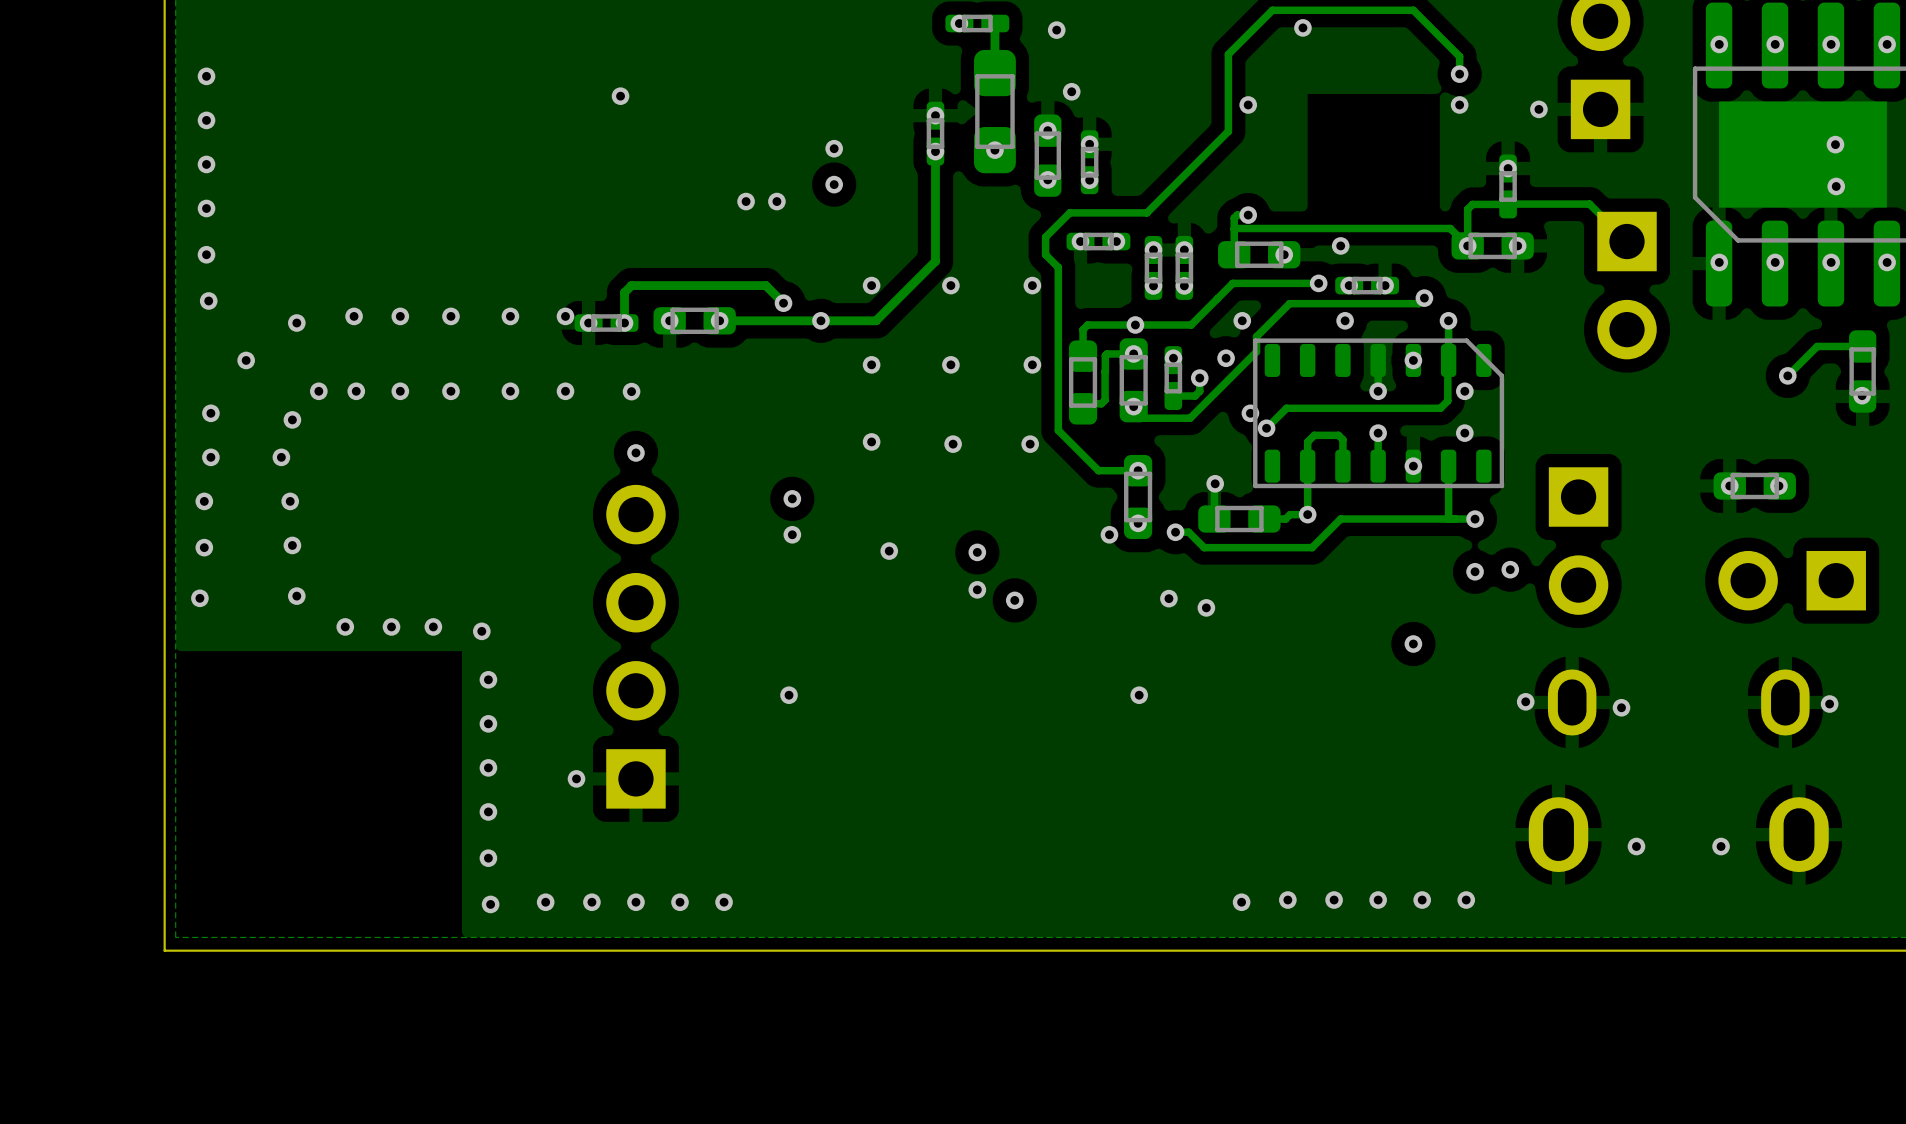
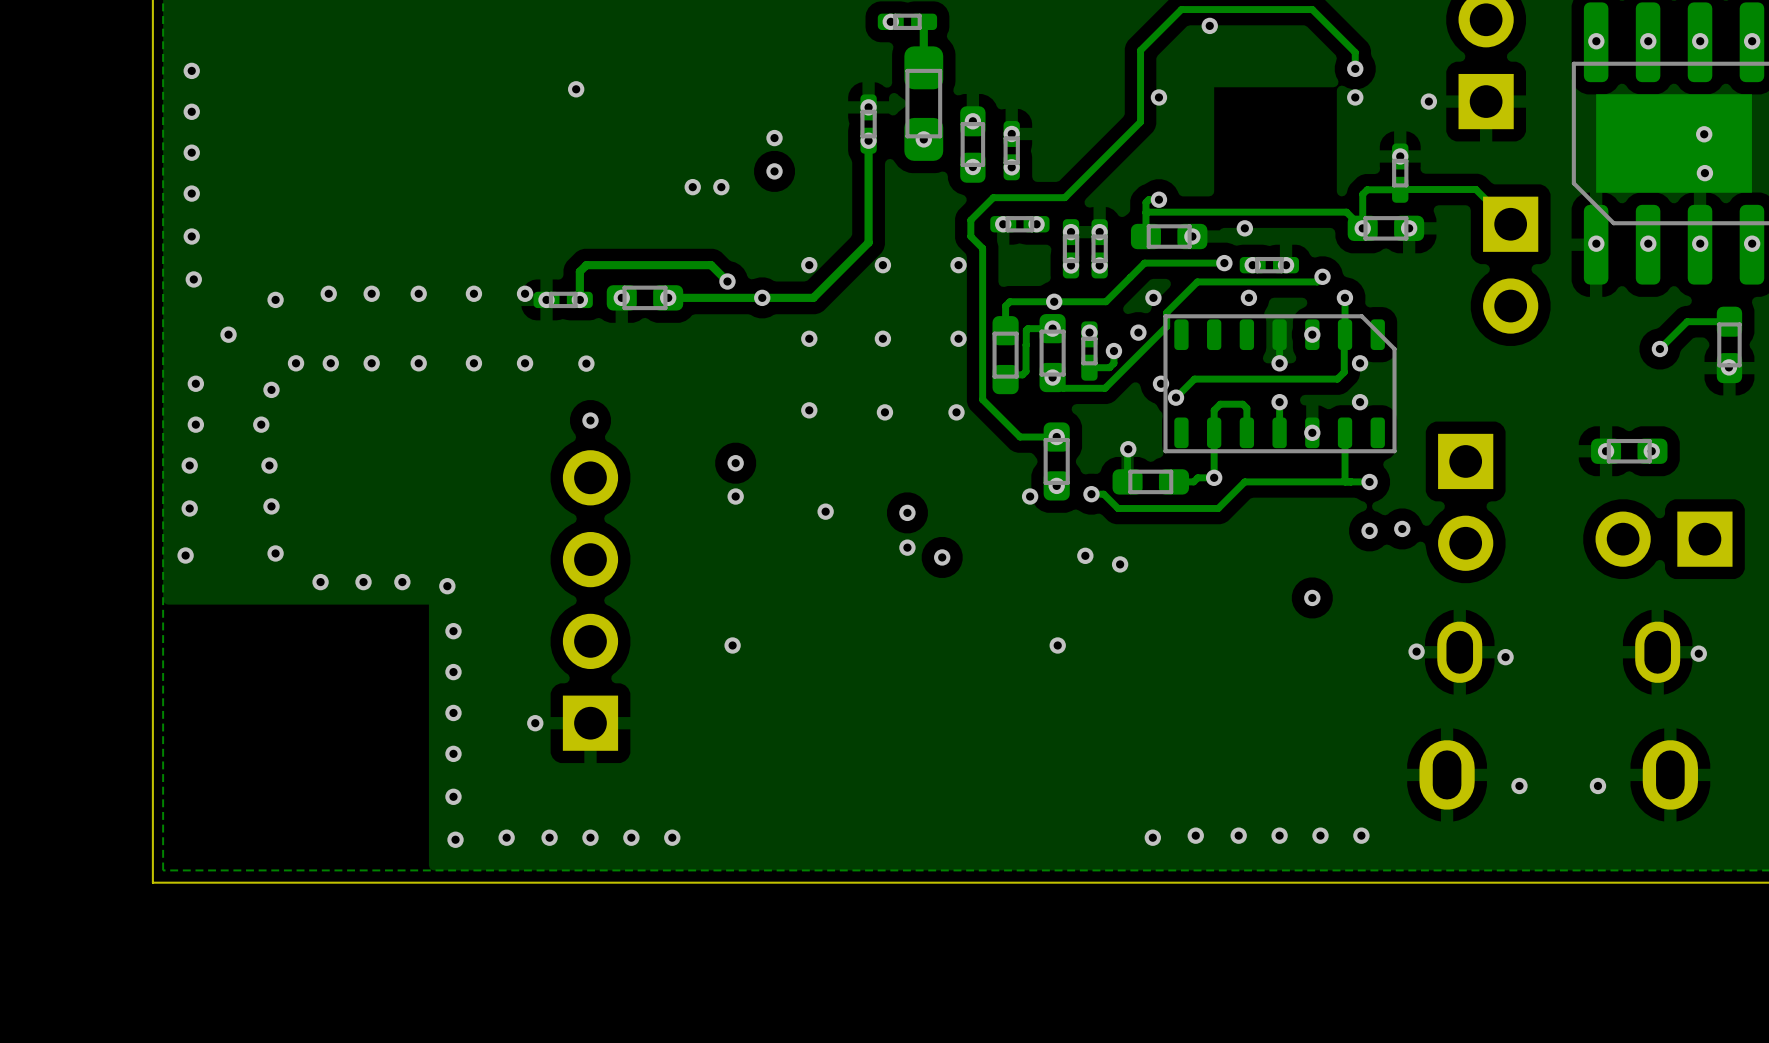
via: (1056, 30) -> none
via: (1071, 91) -> none

